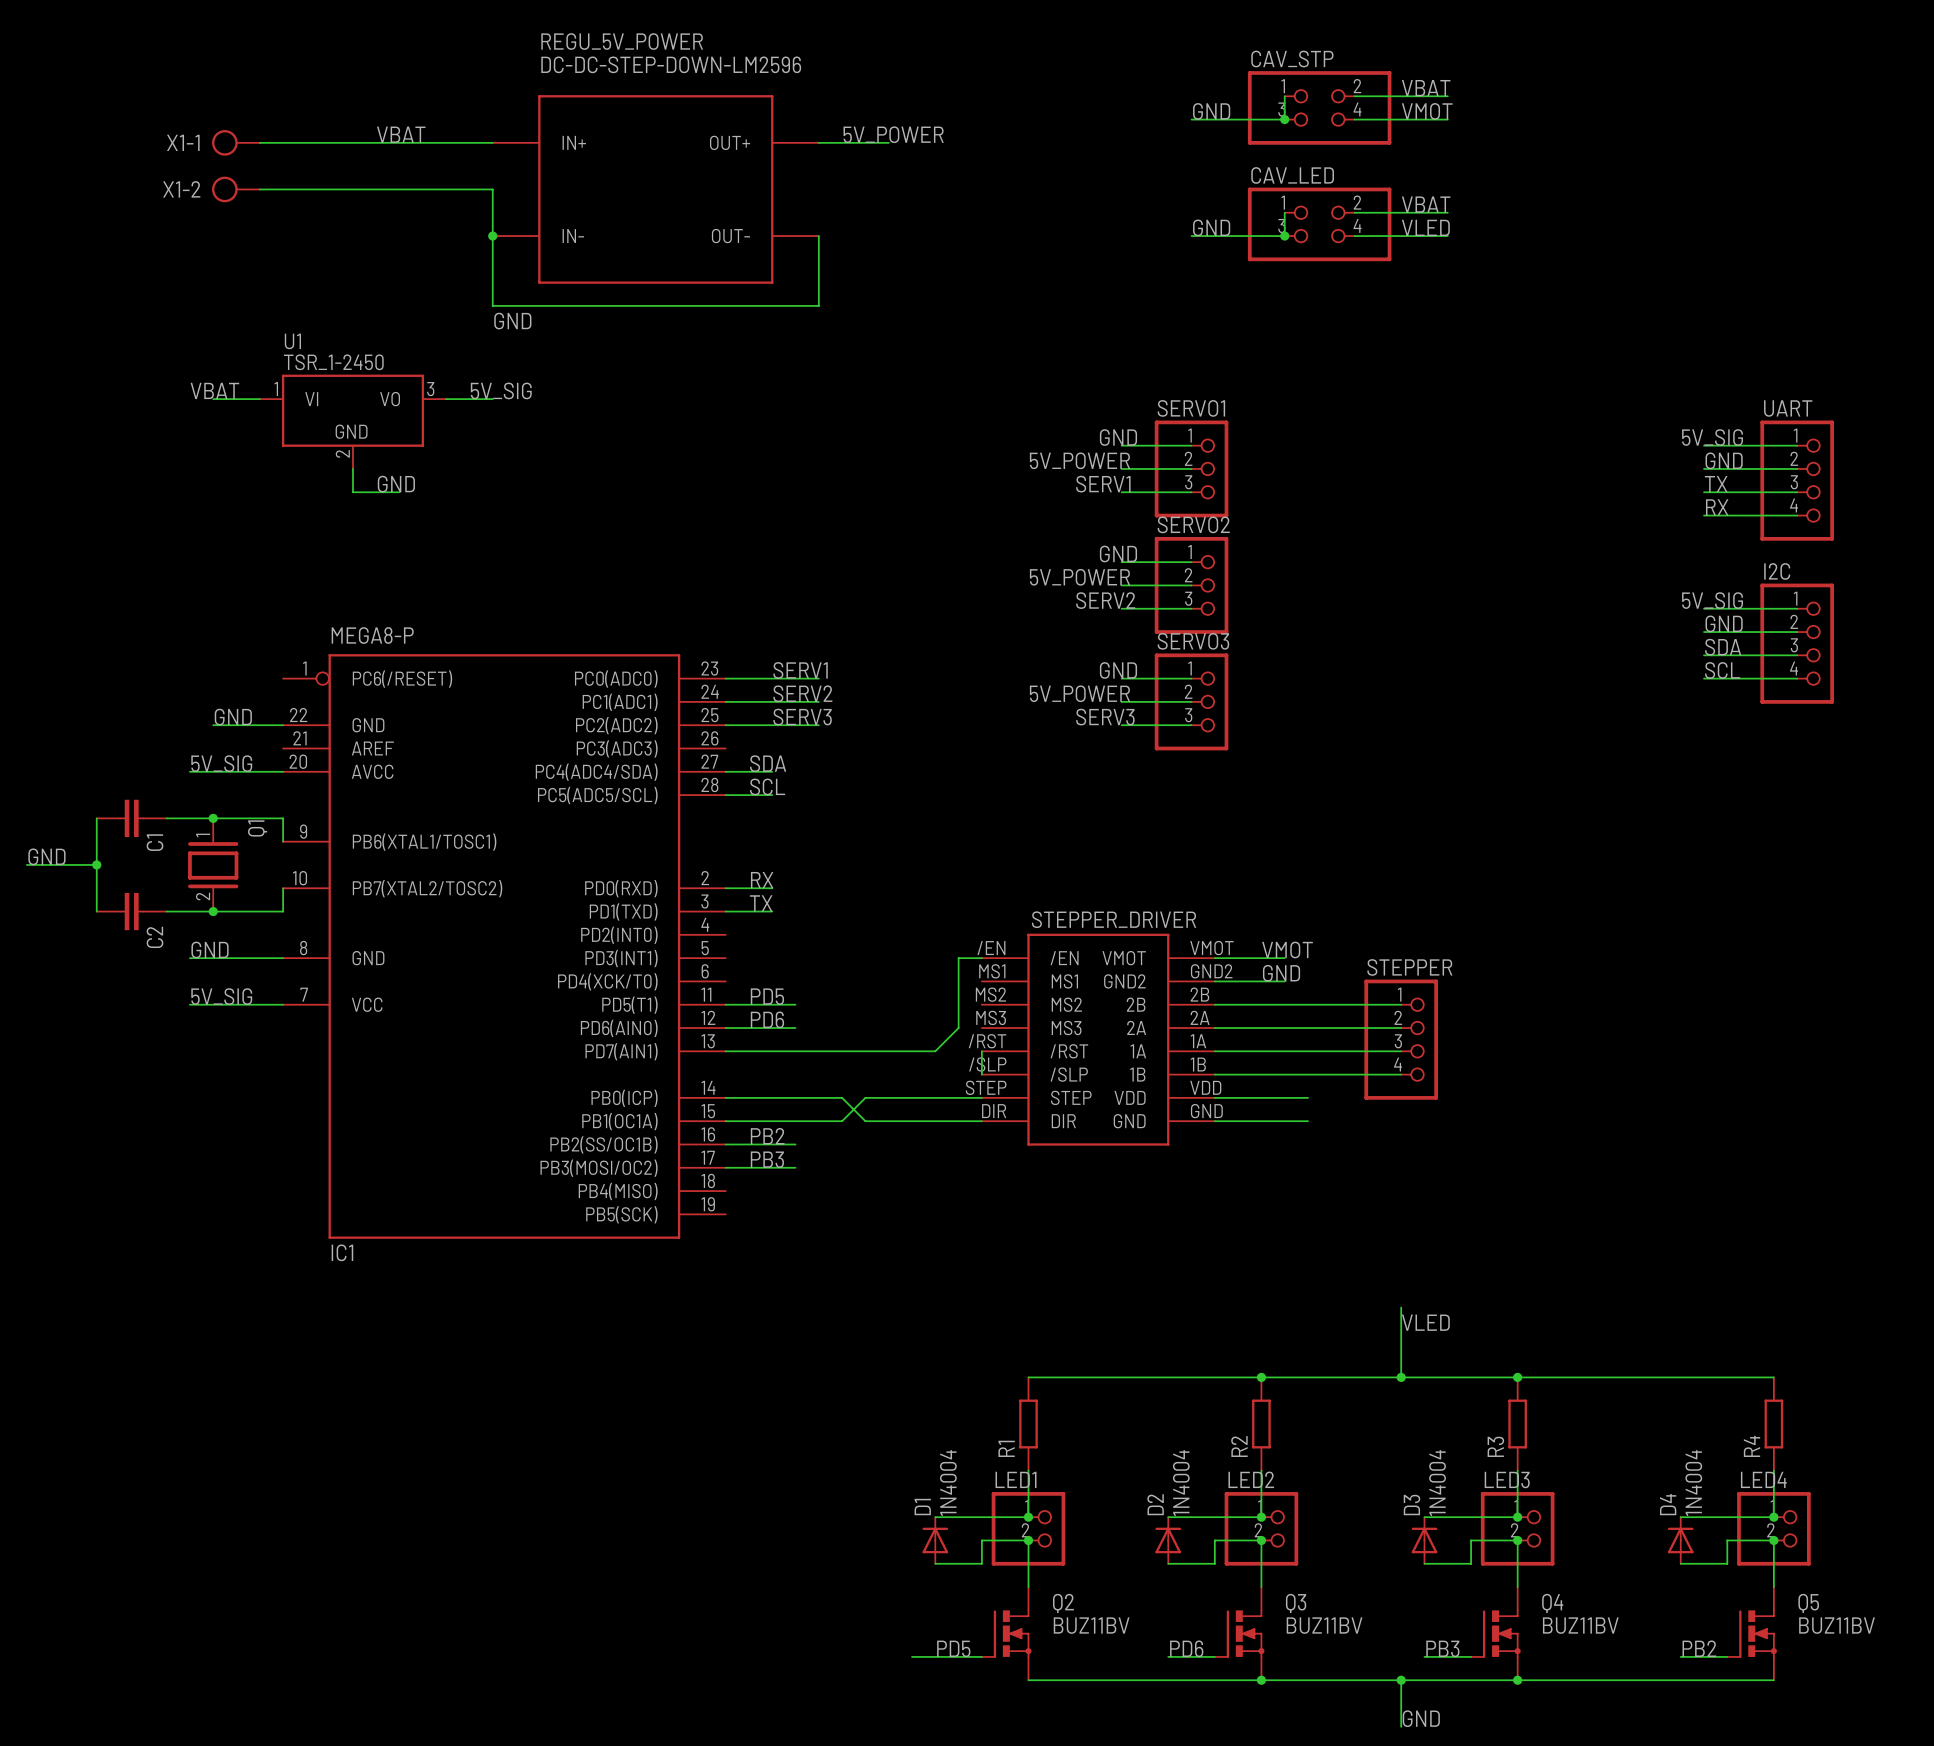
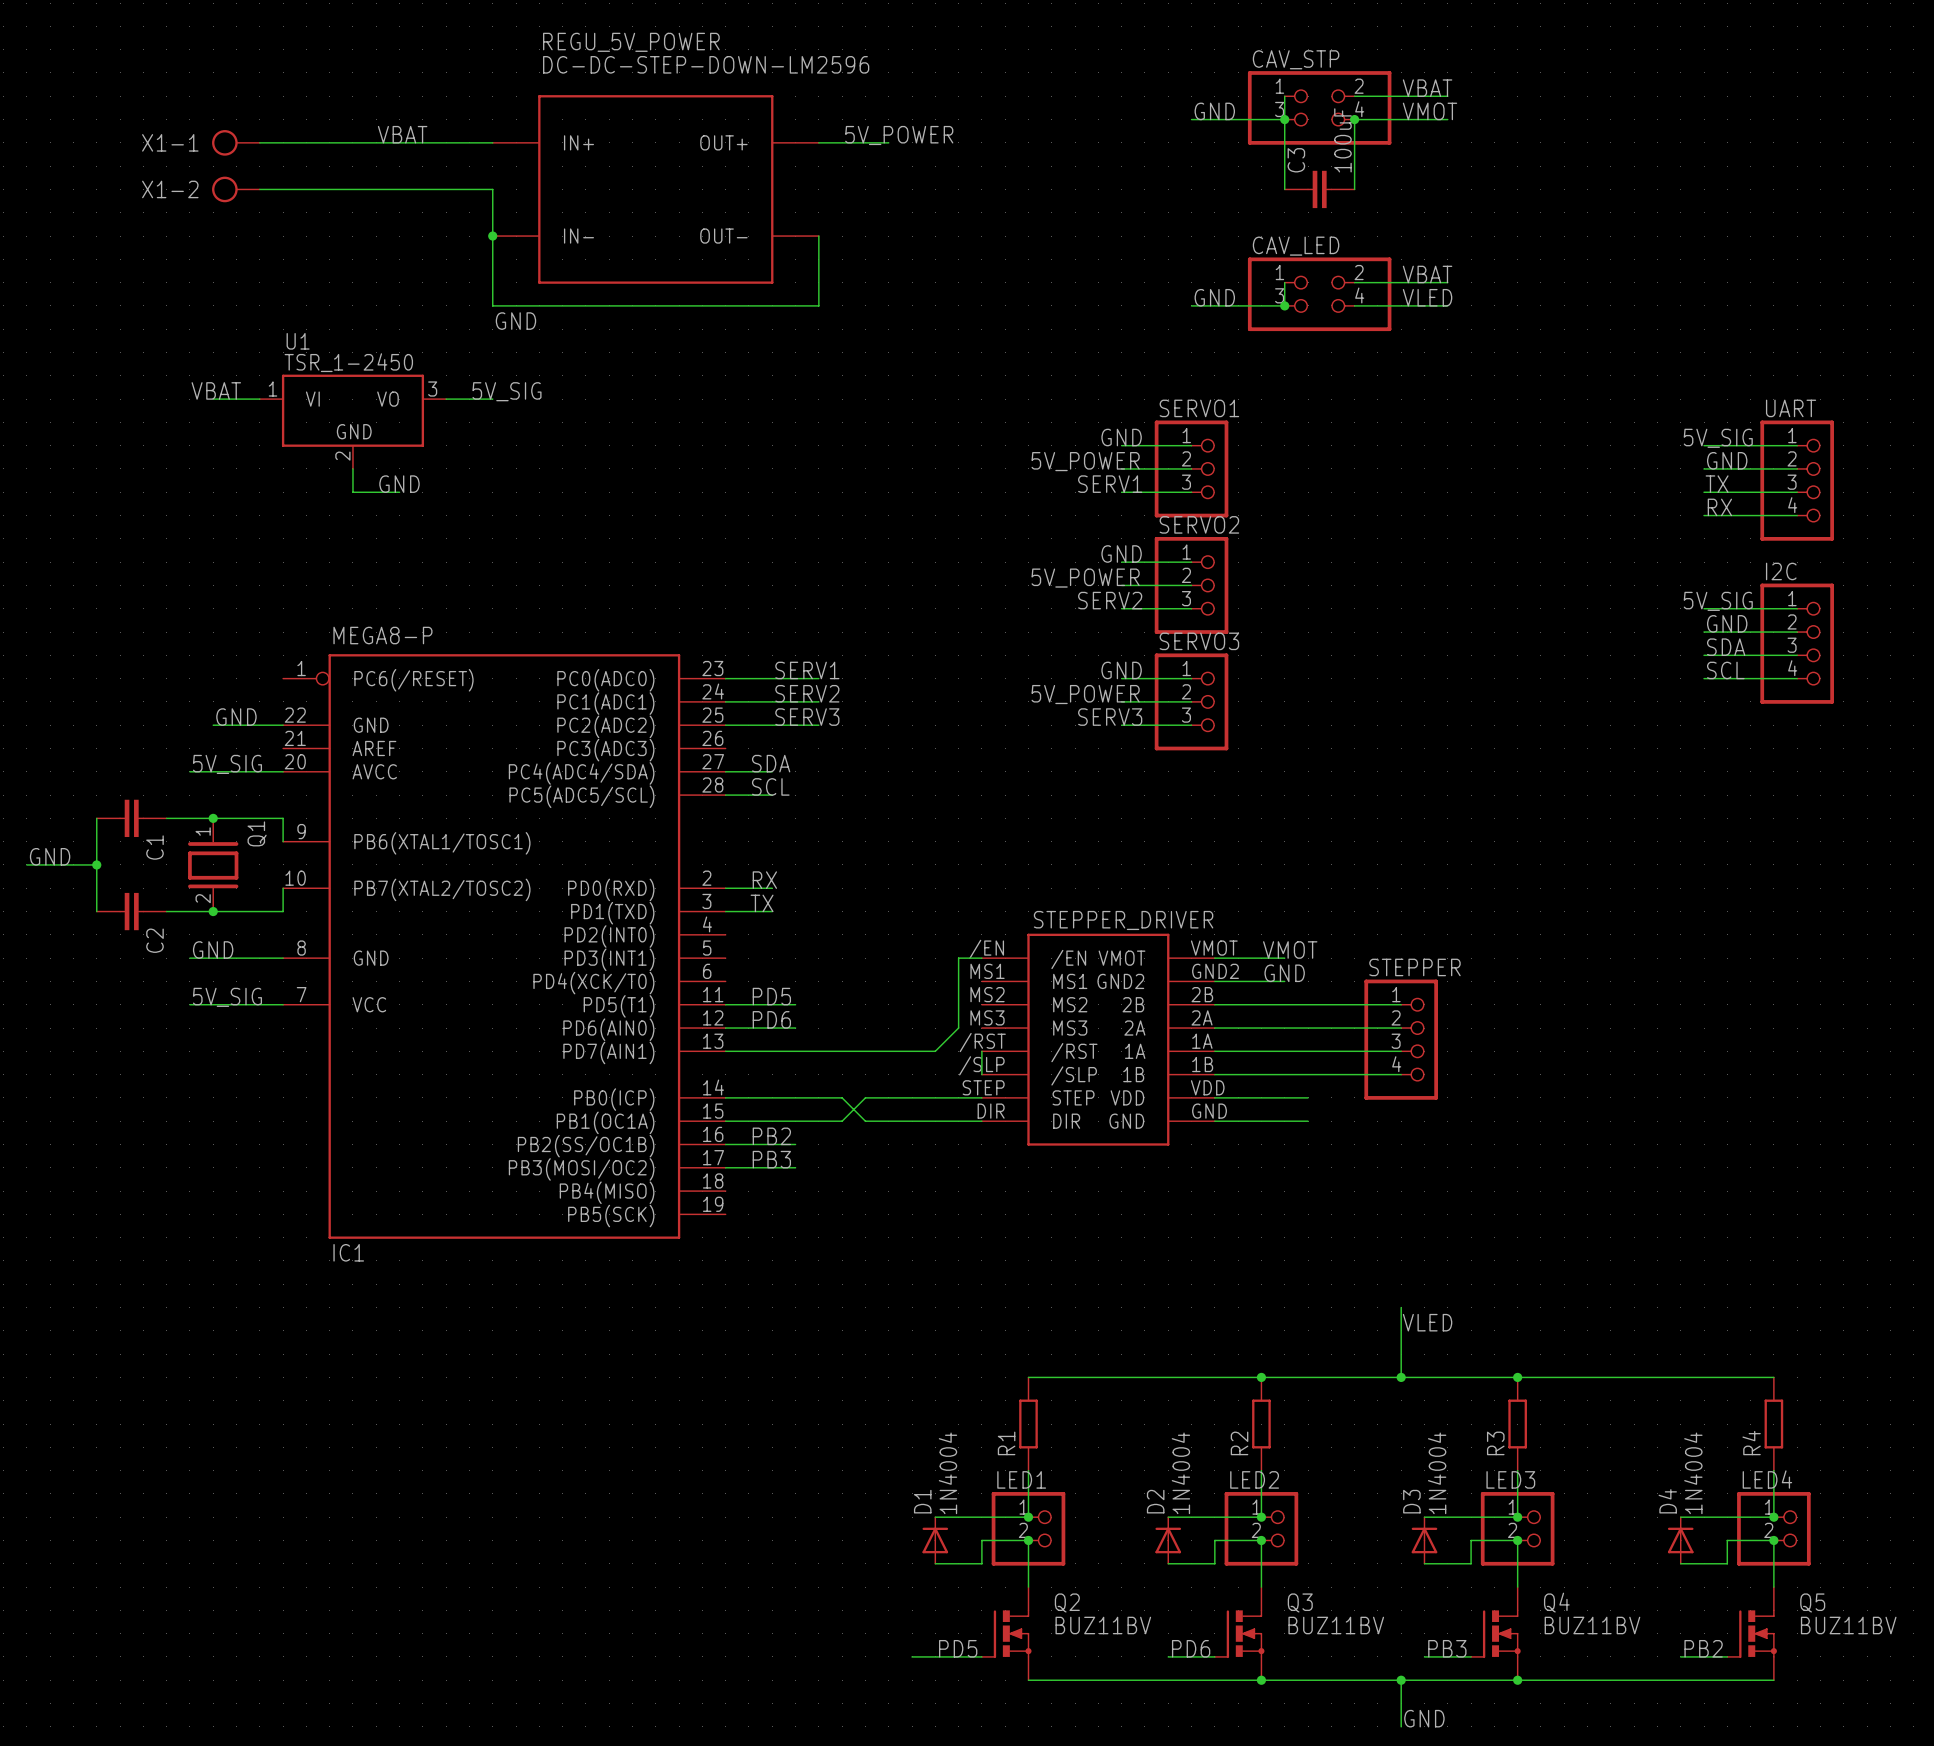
wire: none -> (1284, 119) (1284, 189)
wire: none -> (1354, 119) (1354, 189)
junction: none -> (1354, 119)
C3: none -> 100uF (1319, 189)
label position: VBAT (1426, 204) -> VBAT (1427, 274)
wire: (1284, 212) (1284, 236) (1191, 236) -> (1284, 282) (1284, 305) (1191, 305)
wire: (1354, 212) (1447, 212) -> (1354, 282) (1447, 282)
CAV_LED position: (1319, 224) -> (1319, 294)
label position: GND (1211, 227) -> GND (1214, 297)
label position: VLED (1425, 227) -> VLED (1427, 297)
junction: (1284, 236) -> none
wire: (1354, 236) (1447, 236) -> (1354, 305) (1447, 305)
junction: none -> (1284, 305)

